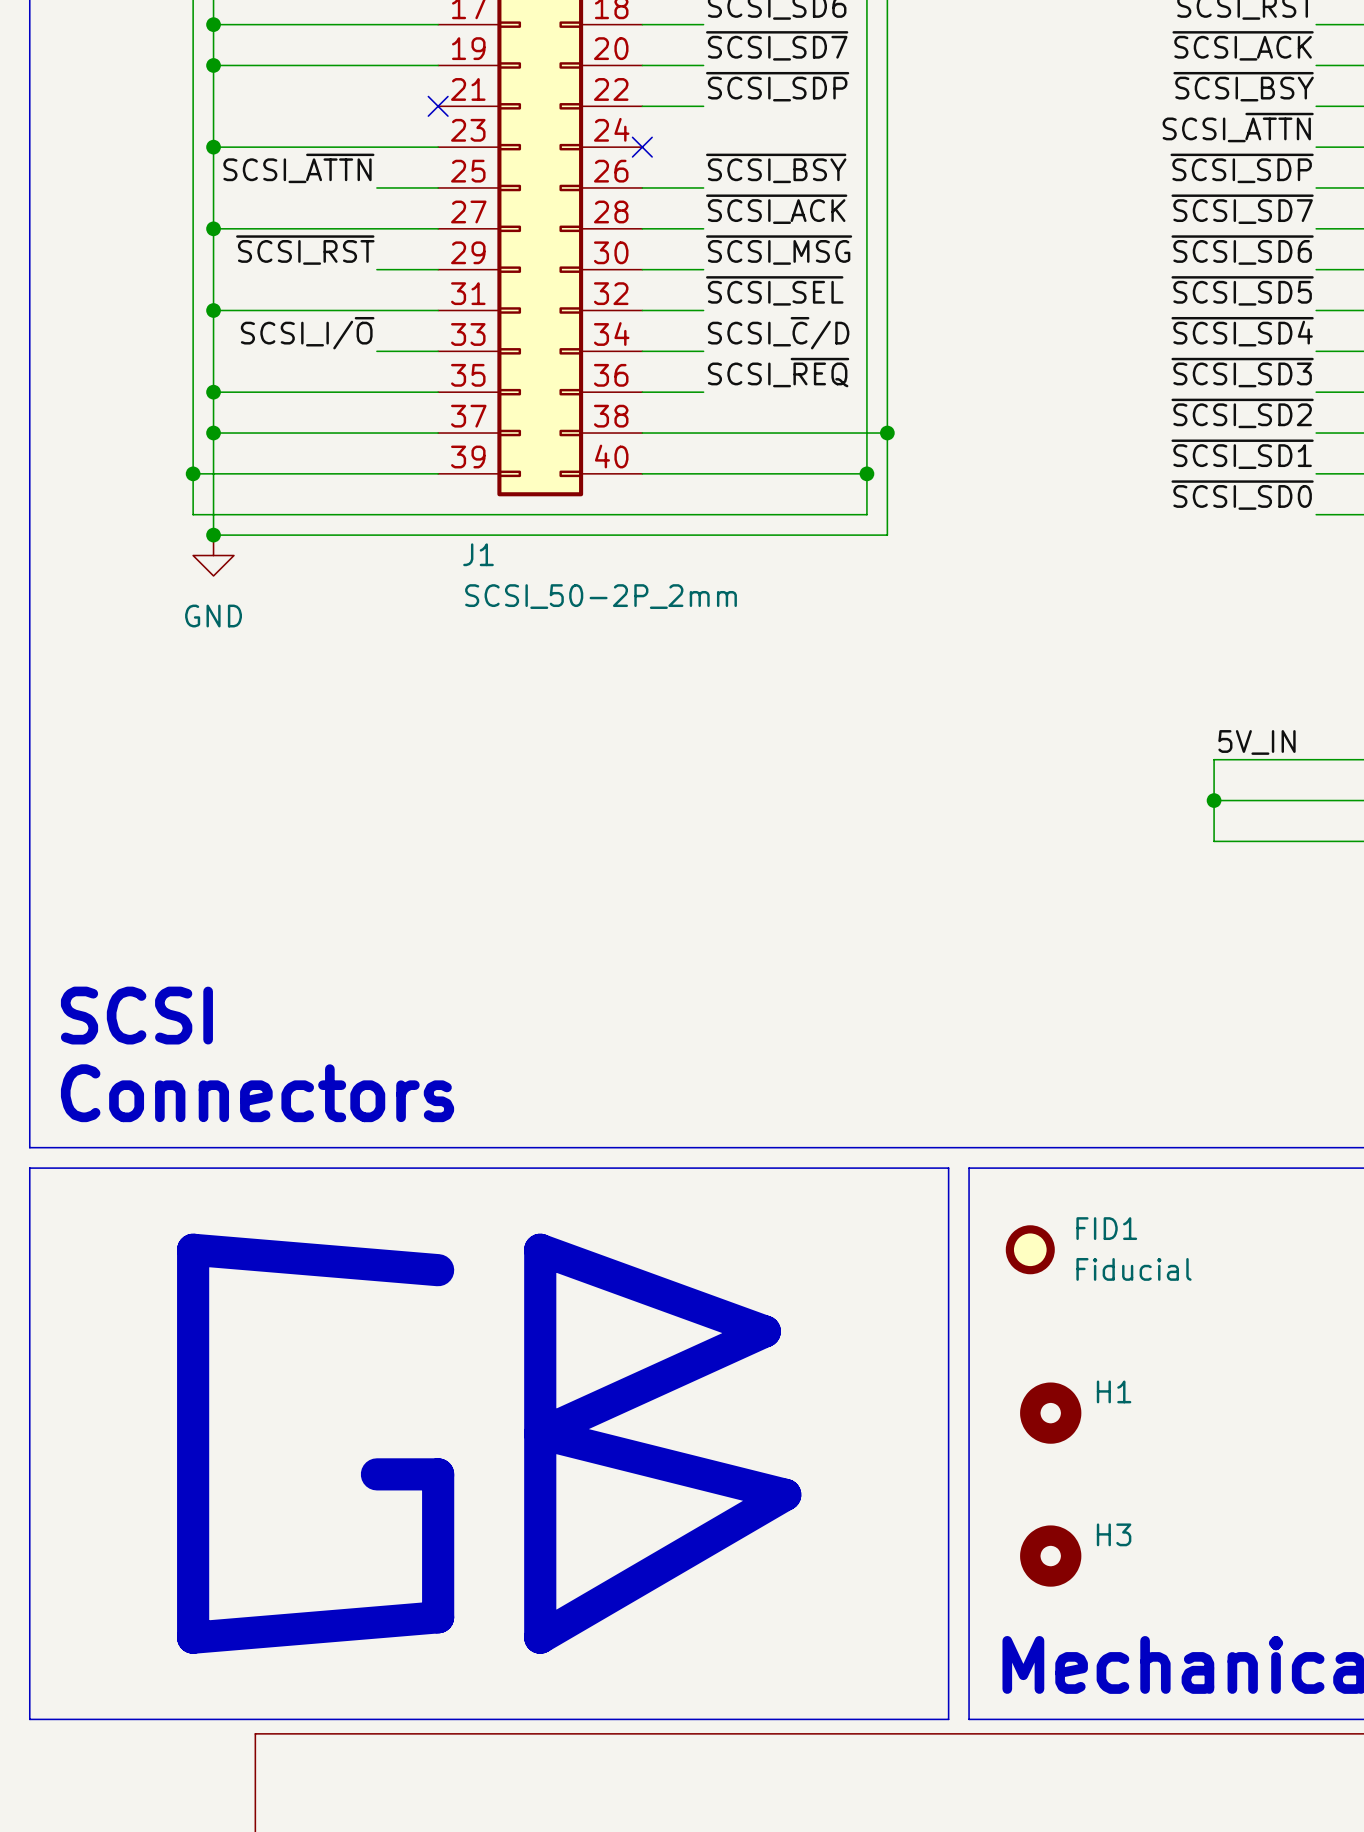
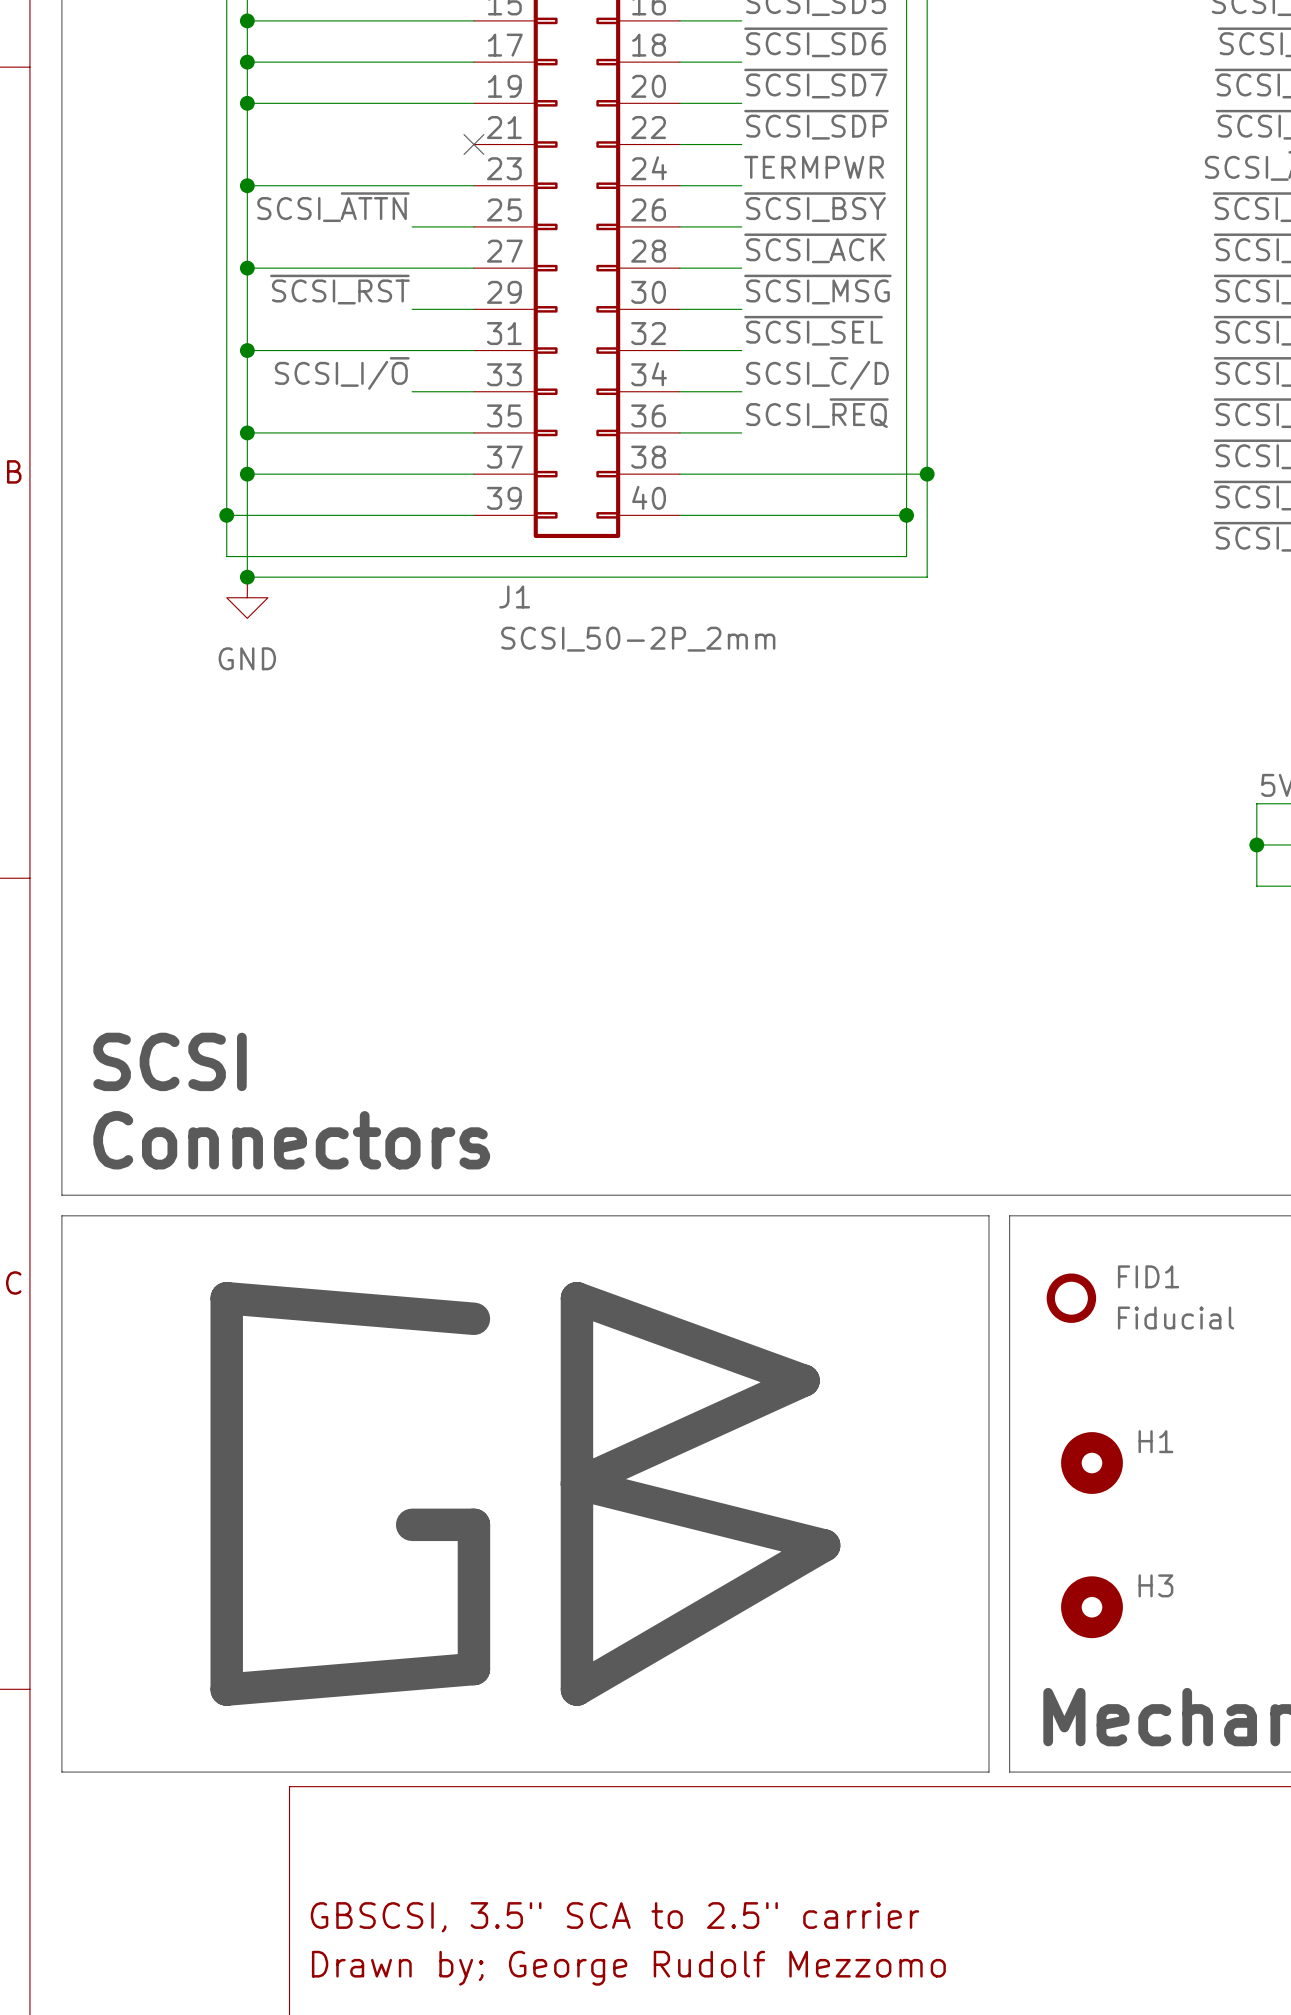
label: none -> TERMPWR (814, 167)
wire: none -> (679, 185) (741, 185)
no-connect mark: (642, 147) -> none

